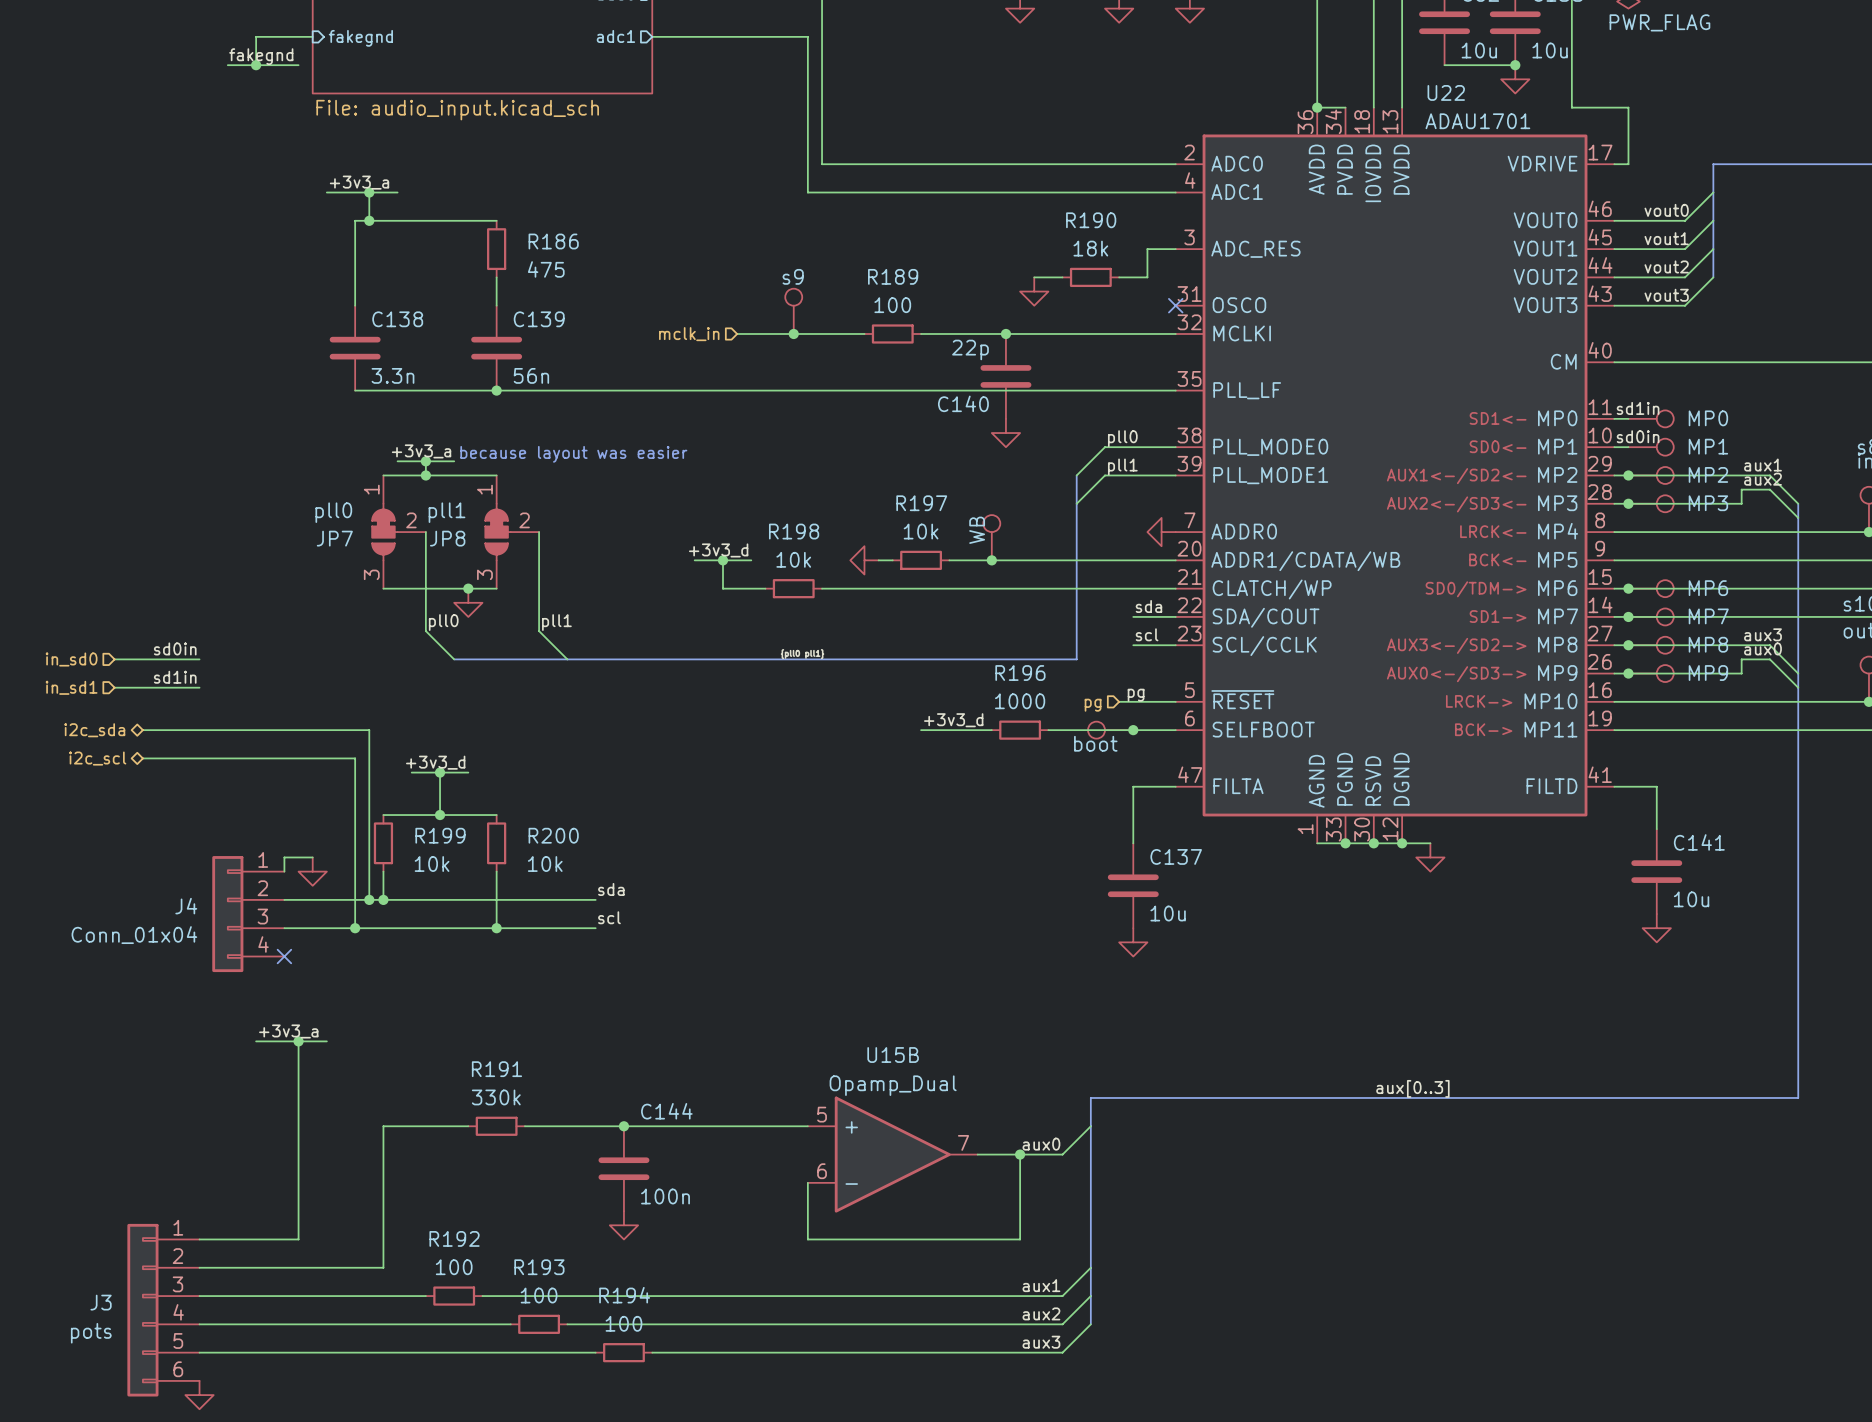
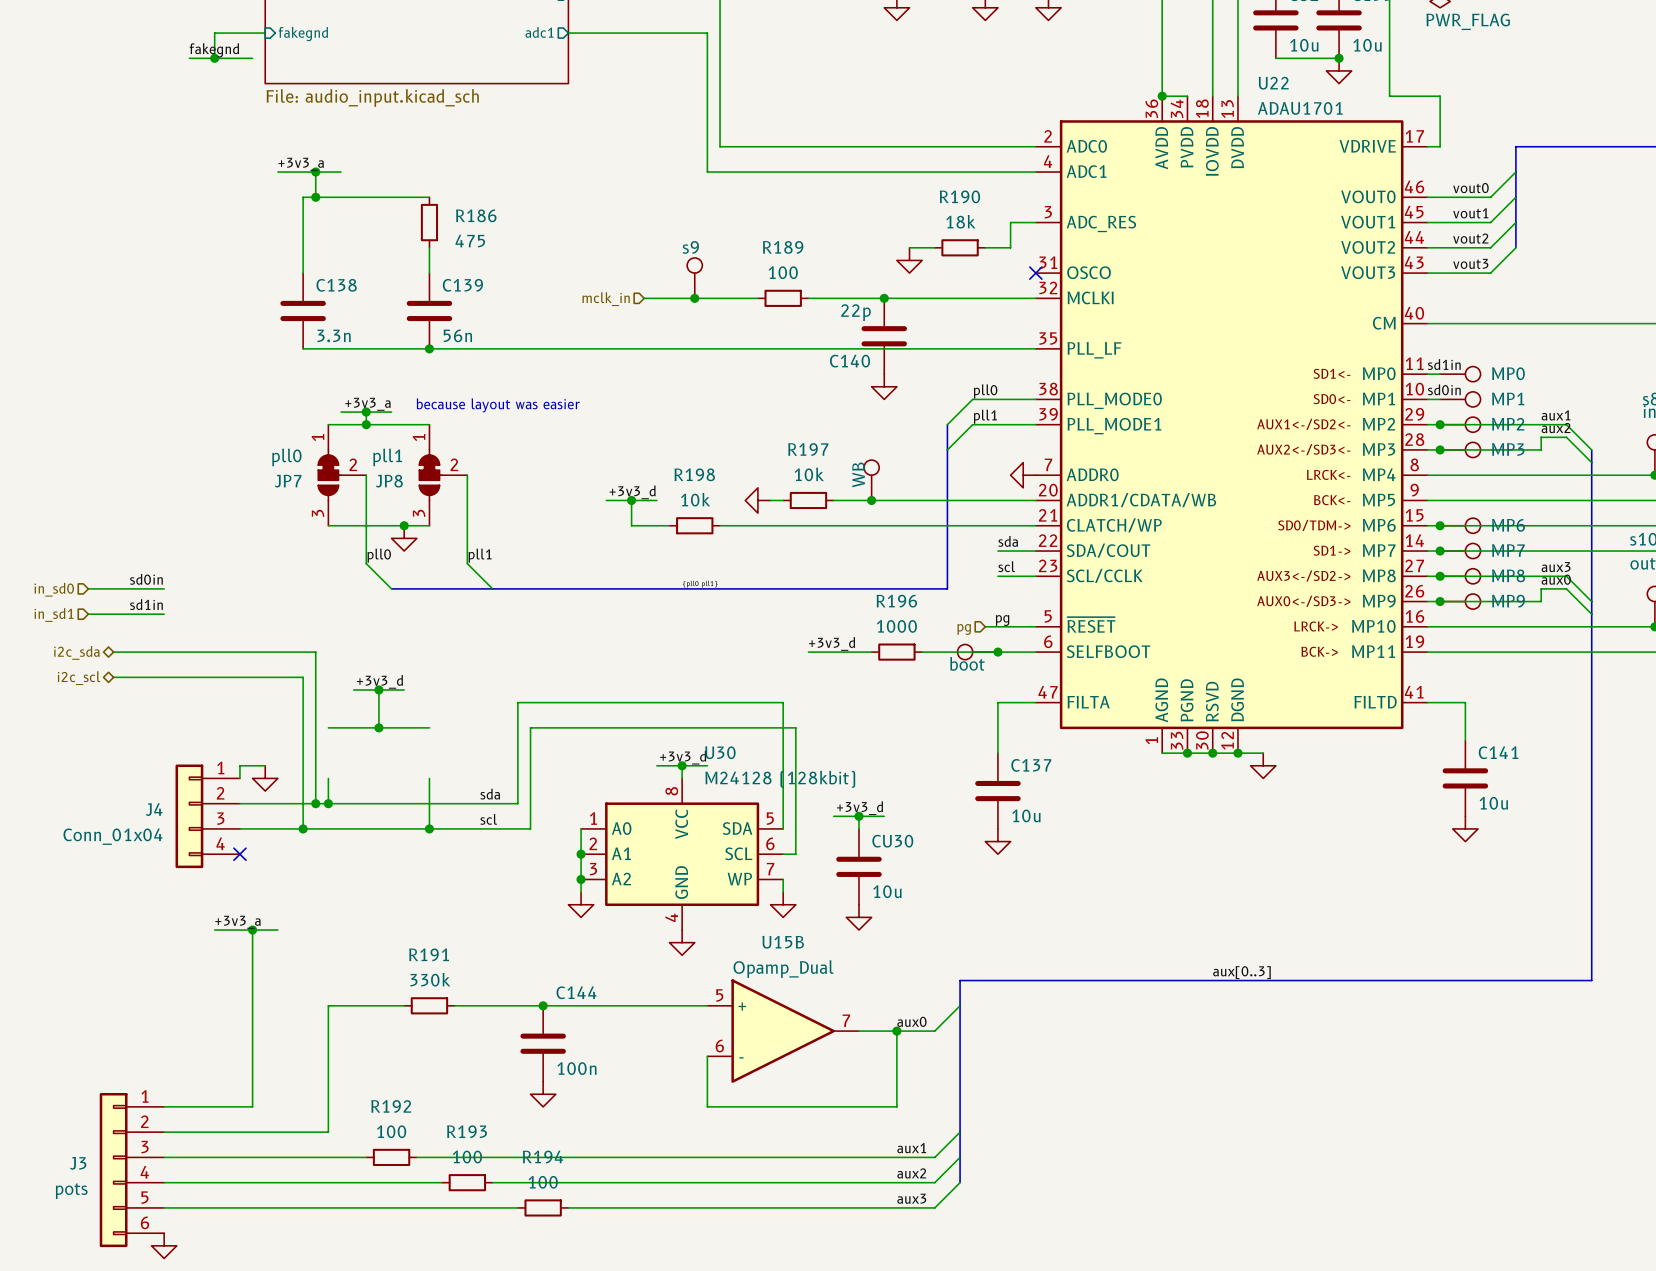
R199: 10k (383, 843) -> none
R200: 10k (496, 843) -> none
label: none -> +3v3_d (683, 757)
wire: none -> (656, 765) (707, 765)
wire: none -> (682, 765) (682, 778)
junction: none -> (682, 765)
label position: sda (611, 889) -> sda (490, 794)
wire: none -> (517, 803) (517, 702) (783, 702) (783, 828)
label: none -> +3v3_d (860, 808)
wire: none -> (833, 816) (884, 816)
wire: none -> (858, 816) (858, 828)
junction: none -> (858, 816)
label position: scl (609, 917) -> scl (488, 819)
wire: none -> (517, 828) (530, 828) (530, 727) (795, 727) (795, 854) (783, 854)
wire: none -> (581, 828) (581, 892)
junction: none -> (581, 854)
U30: none -> M24128 (128kbit) (682, 854)
CU30: none -> 10u (858, 866)
junction: none -> (581, 879)
wire: none -> (783, 879) (783, 892)
power symbol: none -> (581, 904)
power symbol: none -> (783, 904)
power symbol: none -> (858, 917)
power symbol: none -> (682, 942)

